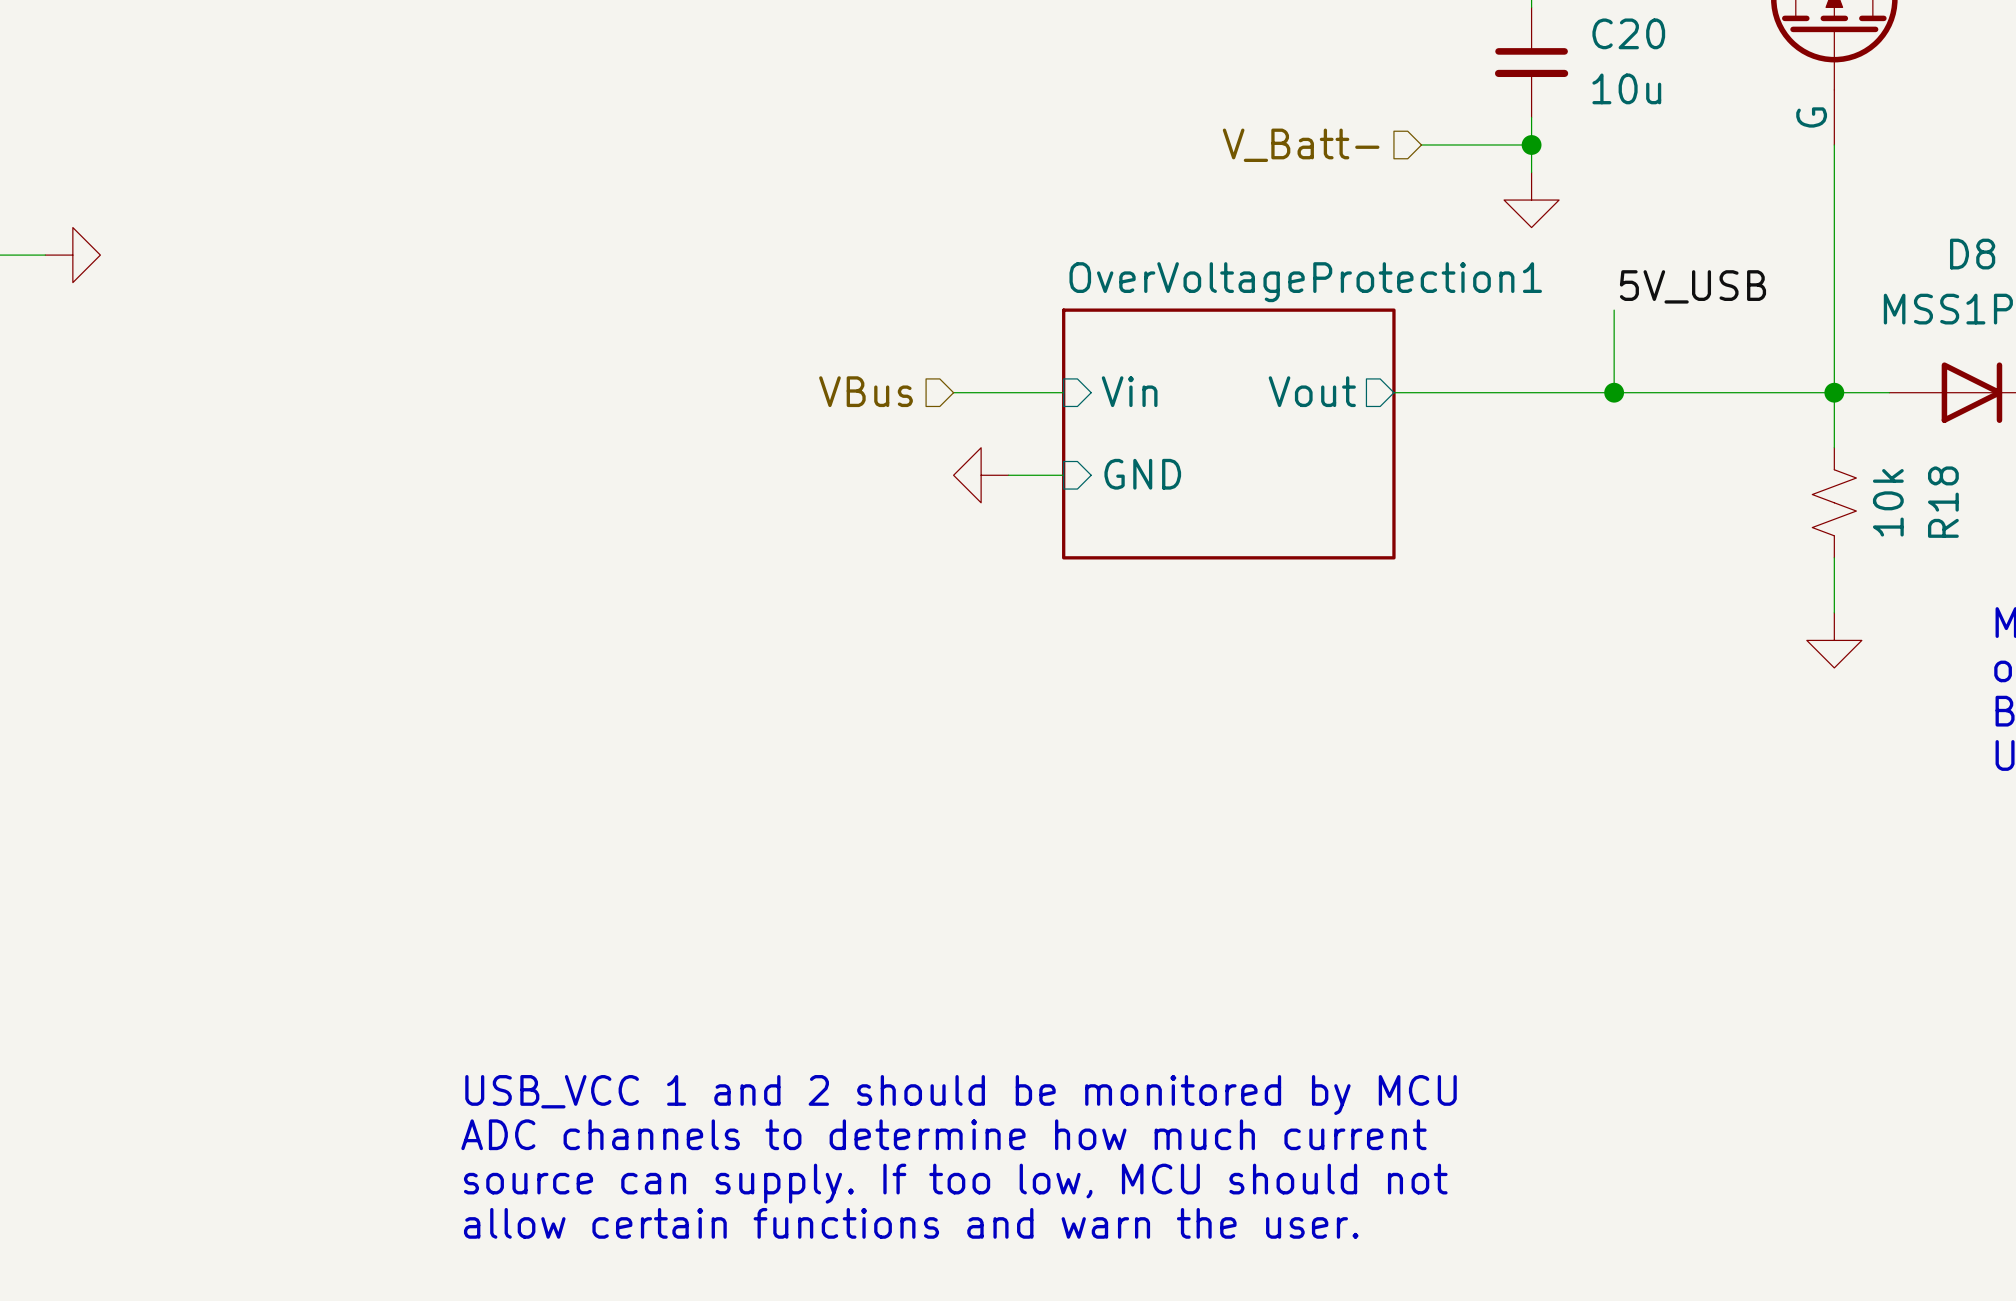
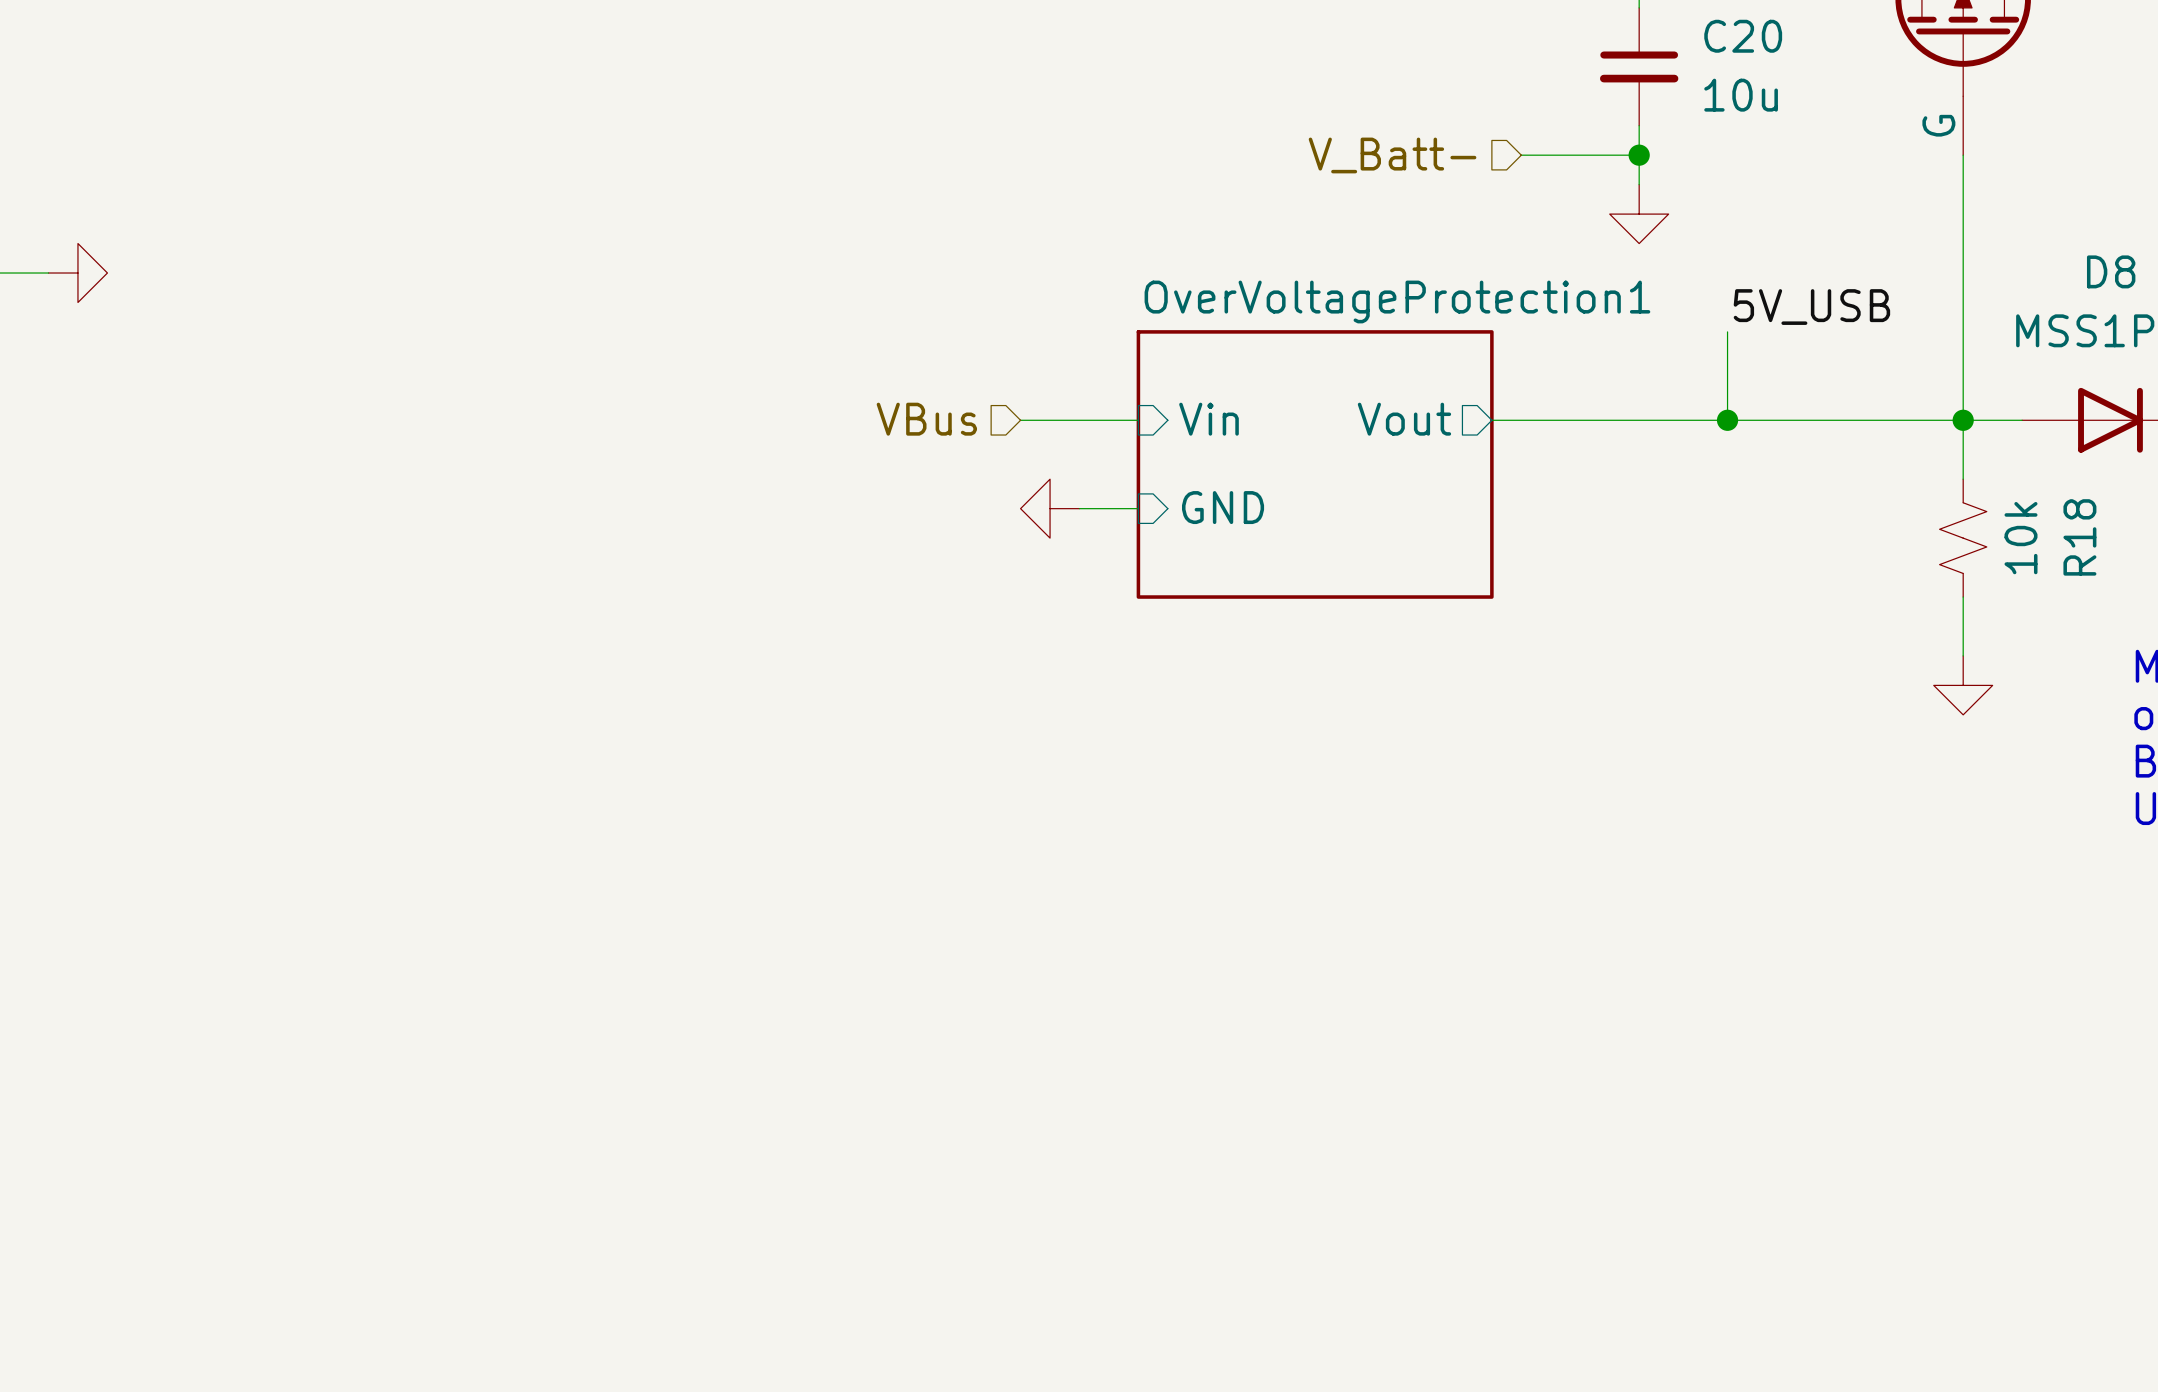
text: USB_VCC 1 and 2 should be monitored by MCU (961, 1095) -> none
text: ADC channels to determine how much current (943, 1134) -> none
text: source can supply. If too low, MCU should not (955, 1183) -> none
text: allow certain functions and warn the user. (911, 1223) -> none

